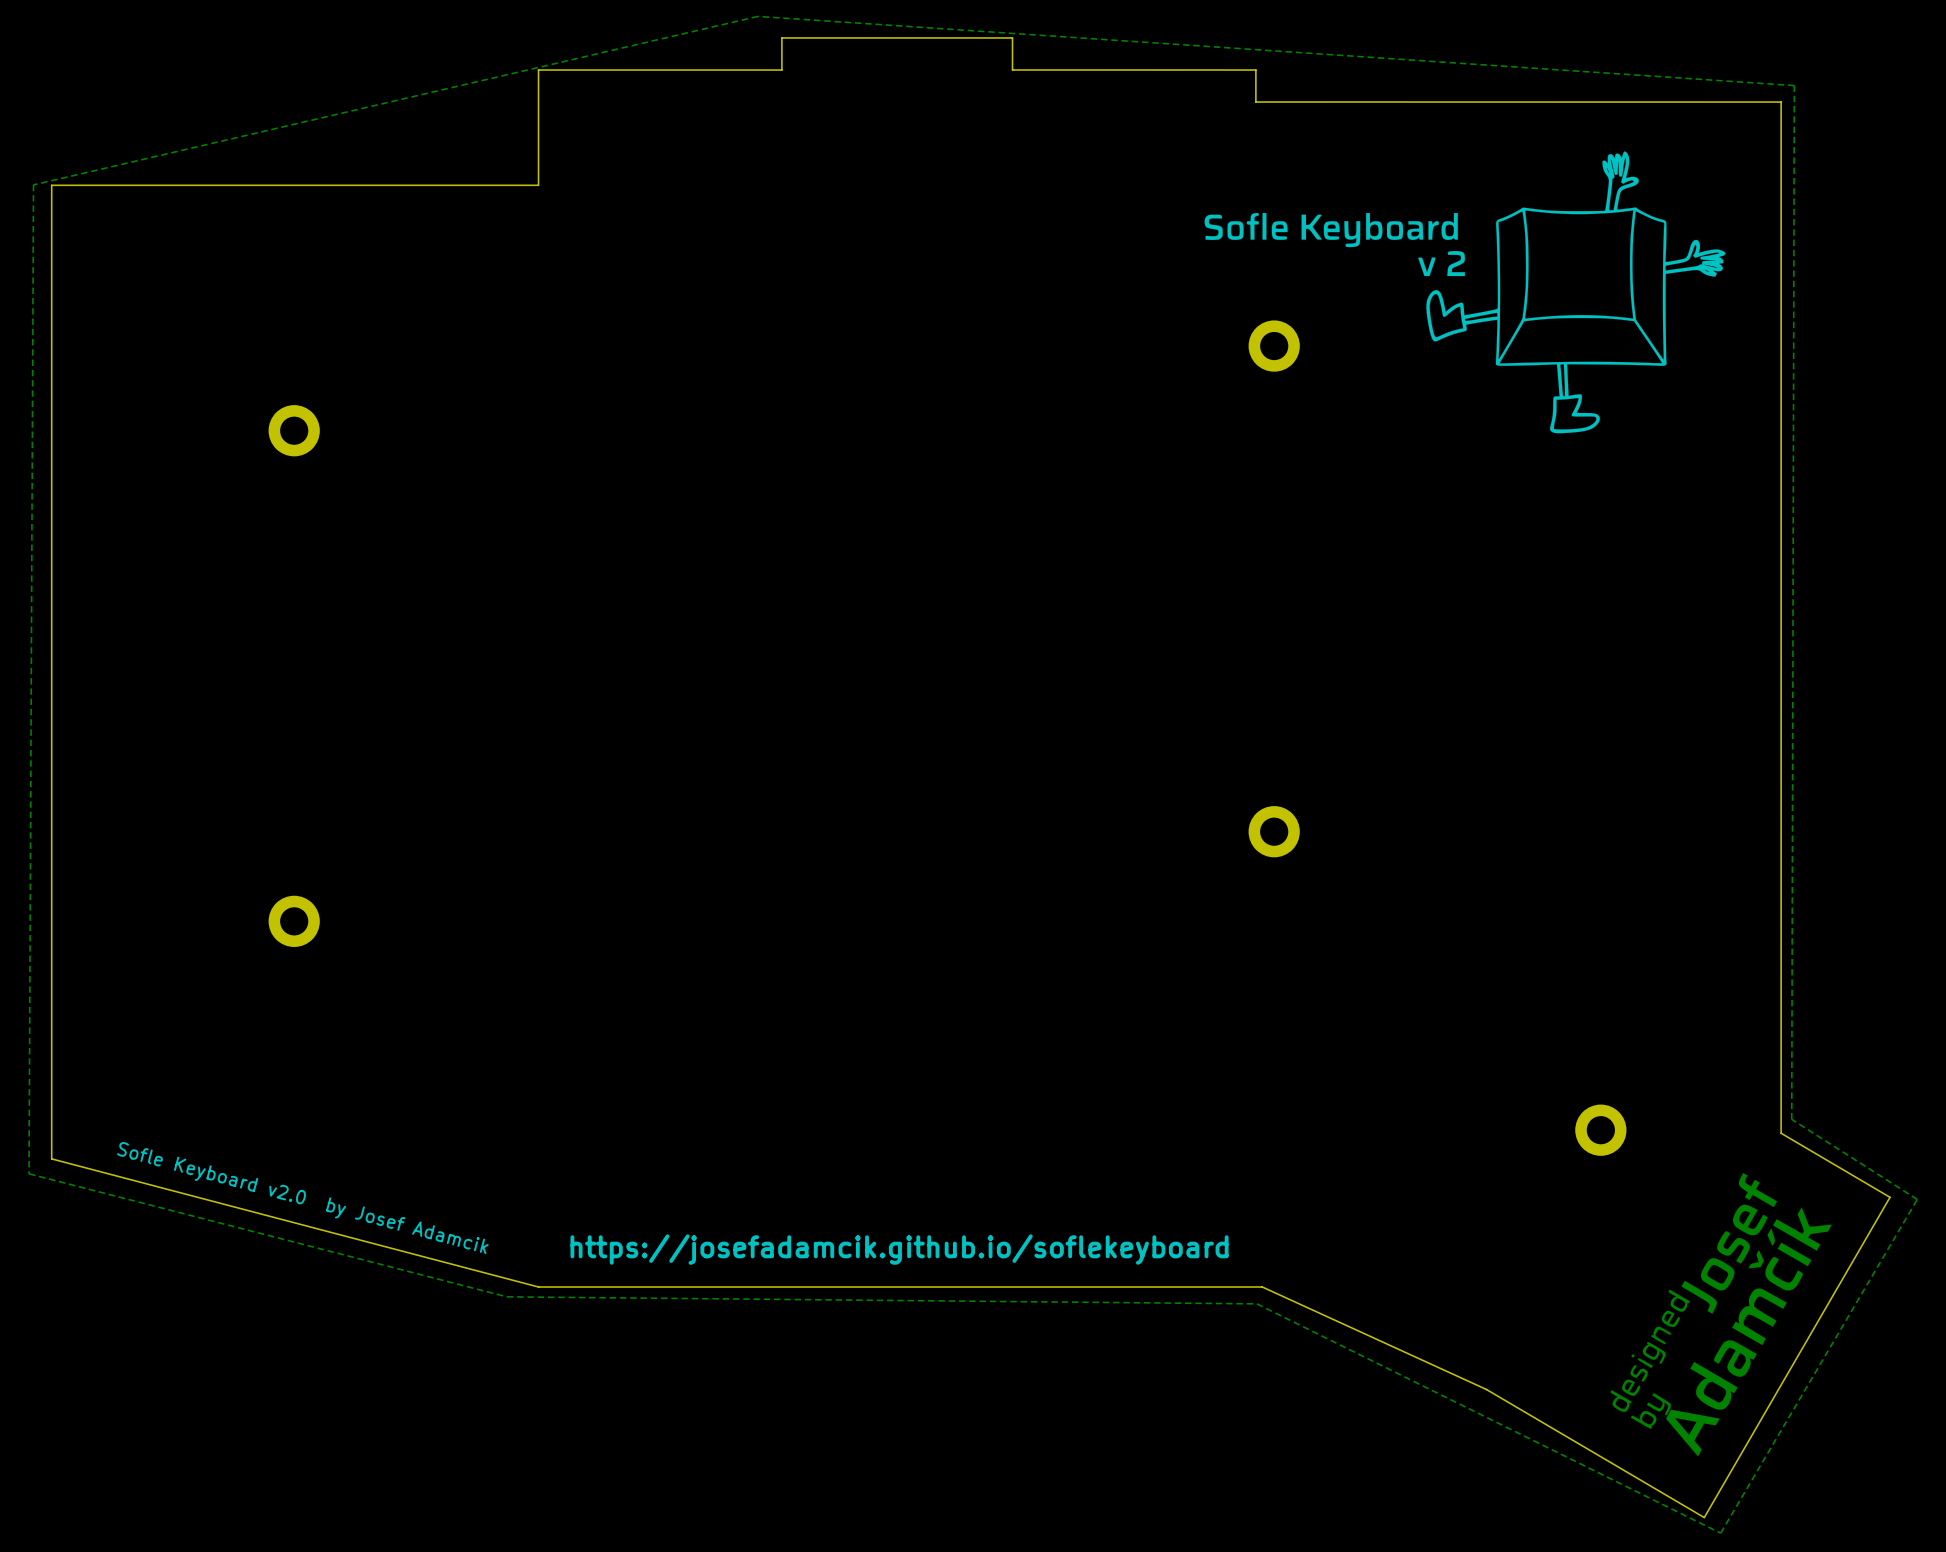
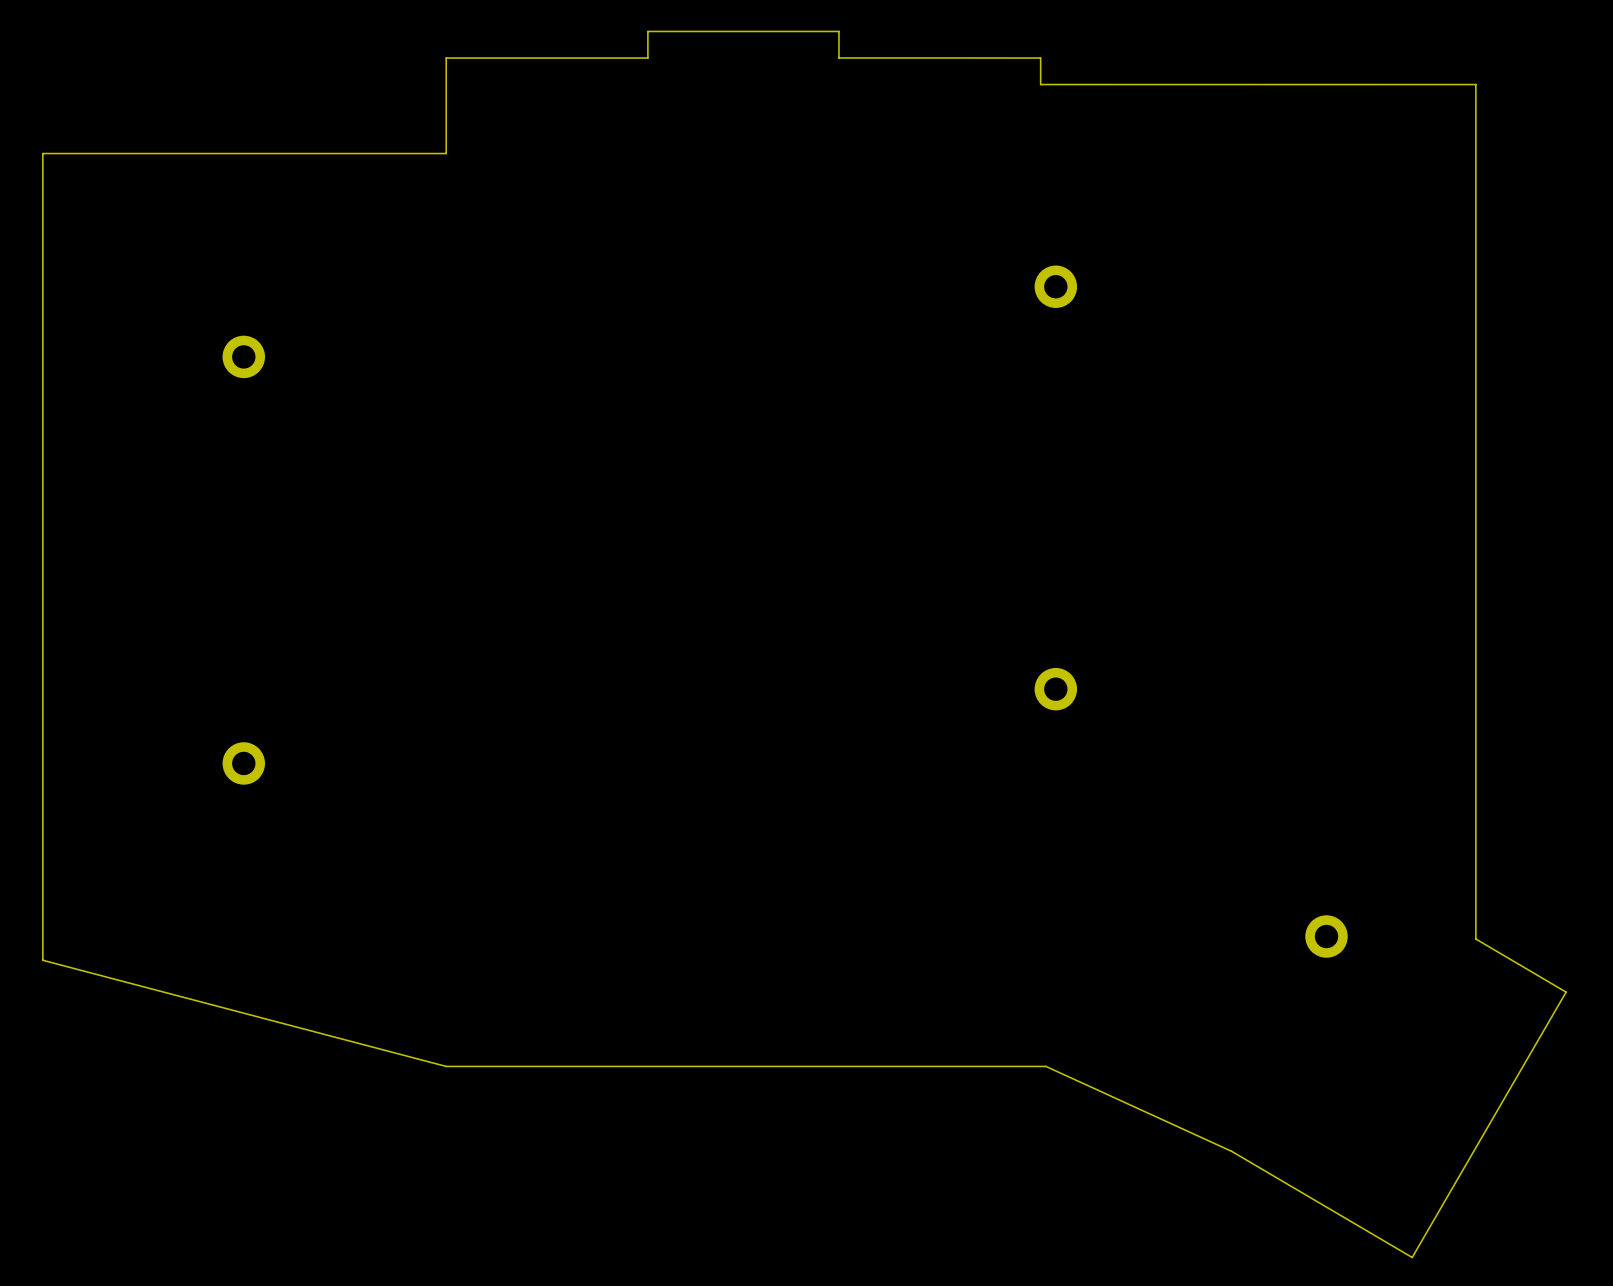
zone outline: (757, 16) (1794, 85) (1791, 1119) (1917, 1199) (1720, 1533) (1256, 1303) (506, 1296) (29, 1173) (33, 184) (757, 16) -> none
drawing: [1204, 151, 1726, 434] -> none
drawing: [1610, 1172, 1832, 1457] -> none
text: Sofle Keyboard v2.0 by Josef Adamcik (302, 1198) -> none
text: https://josefadamcik.github.io/soflekeyboard (899, 1249) -> none

